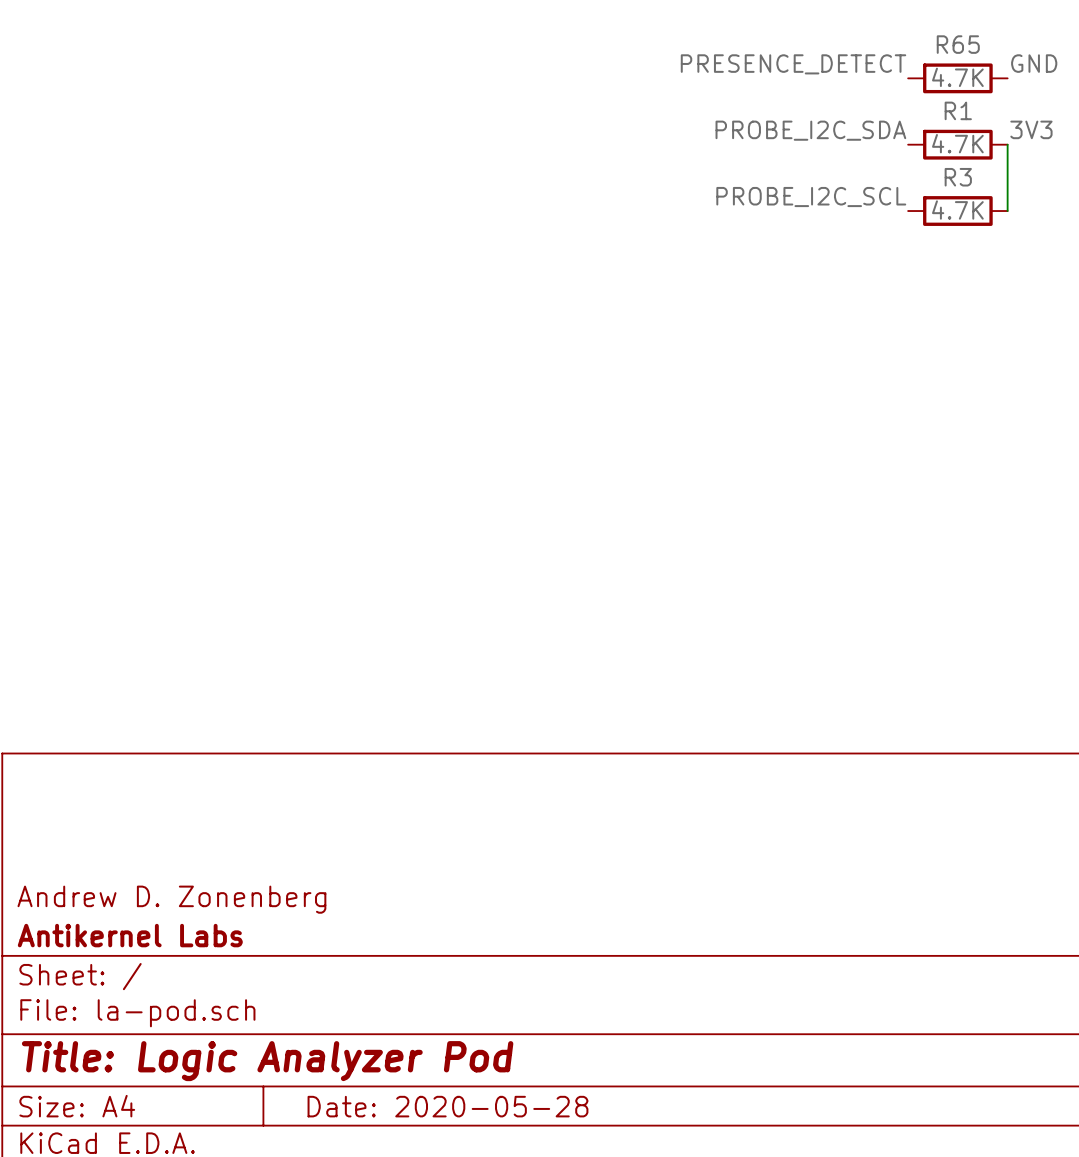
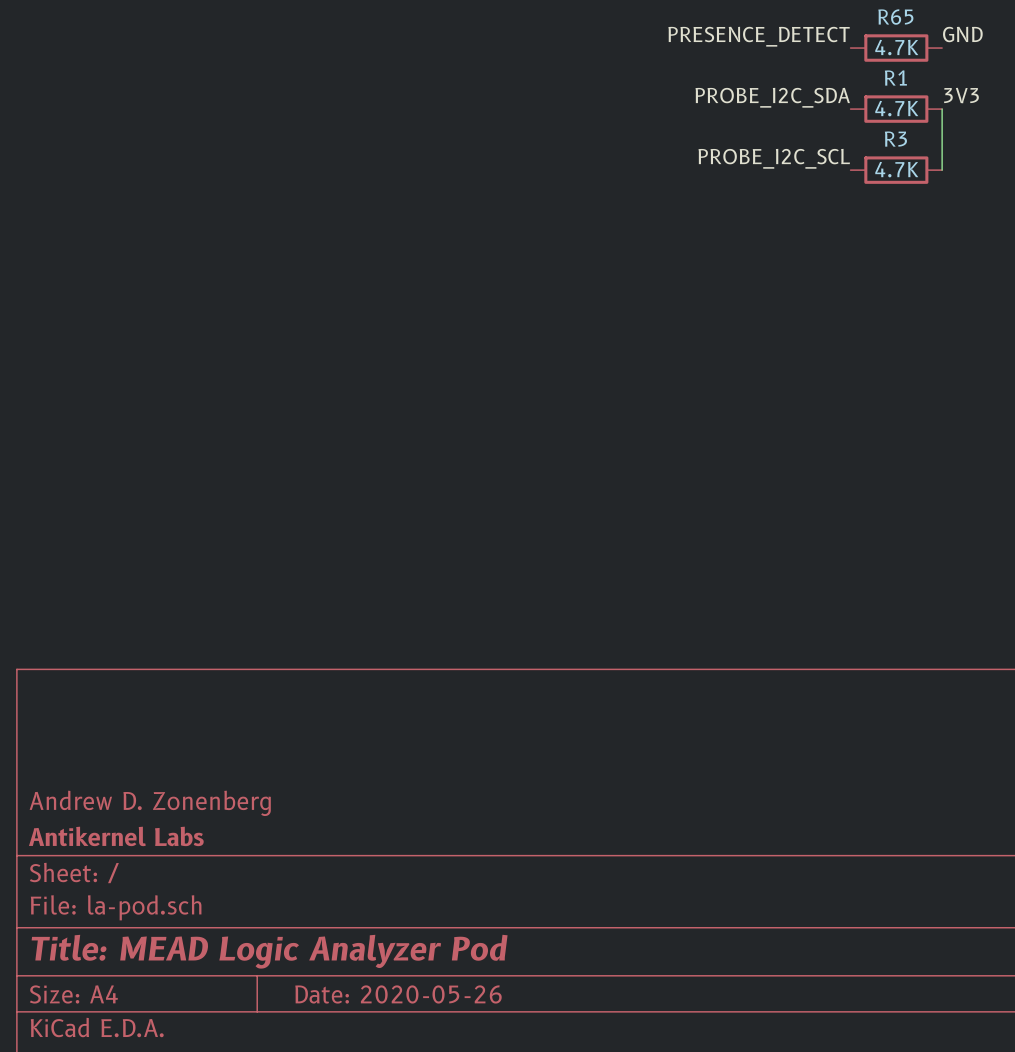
title block: Title: Logic Analyzer Pod (267, 1061) -> Title: MEAD Logic Analyzer Pod (269, 951)
title block: Date: 2020-05-28 (447, 1106) -> Date: 2020-05-26 (398, 994)

